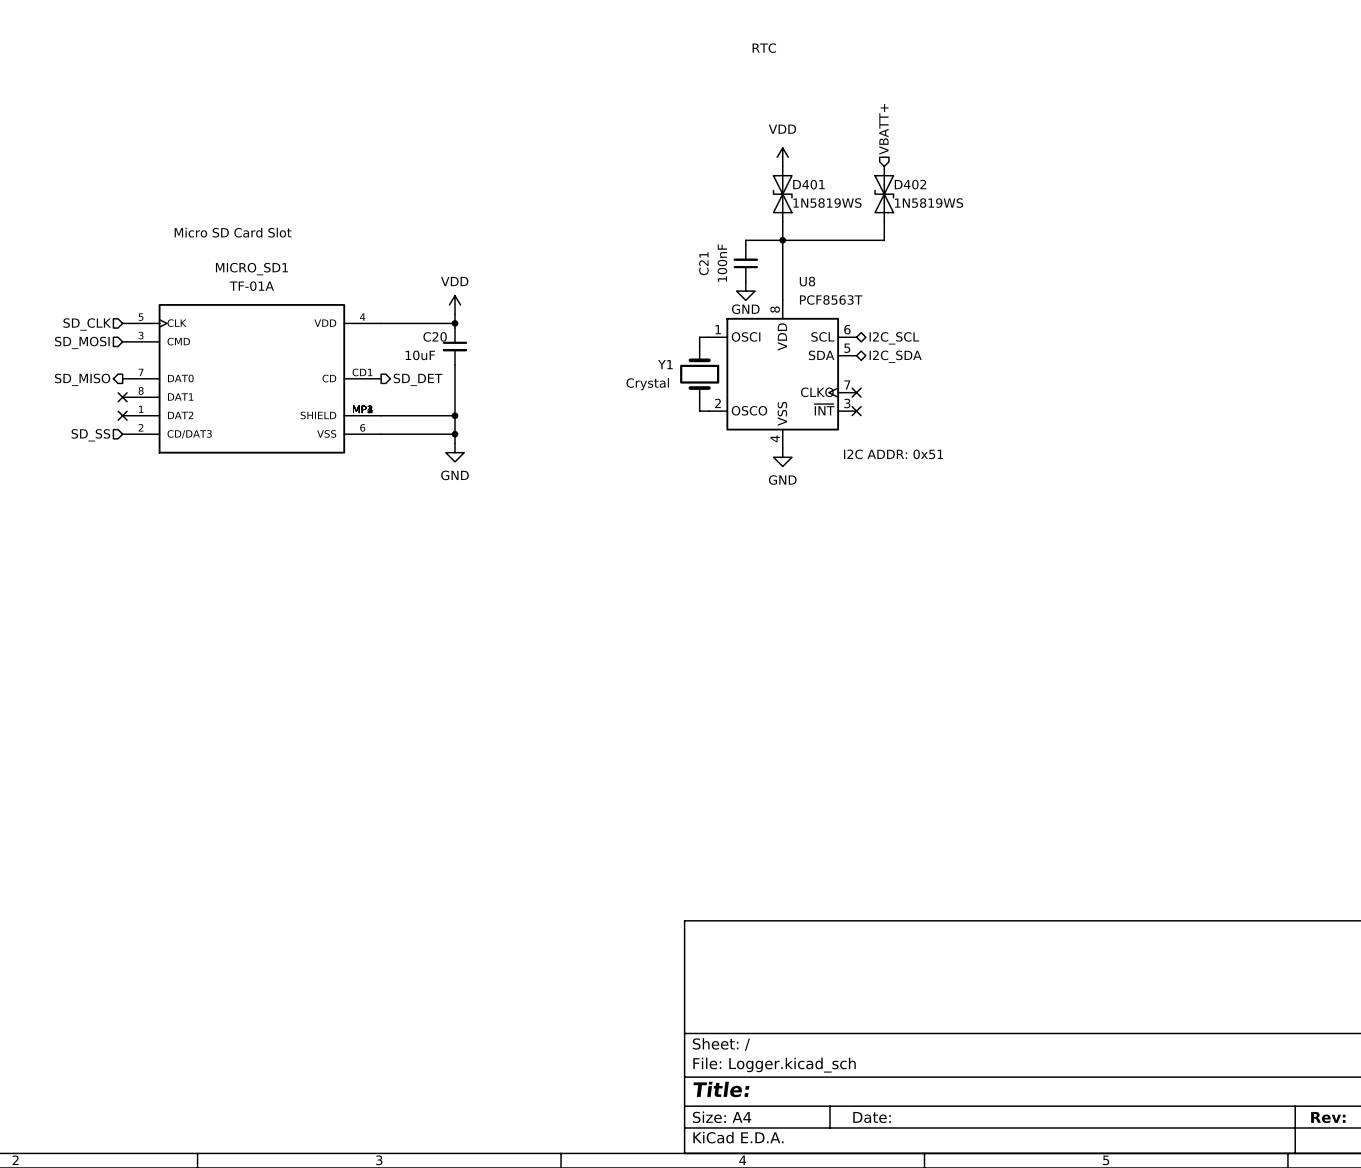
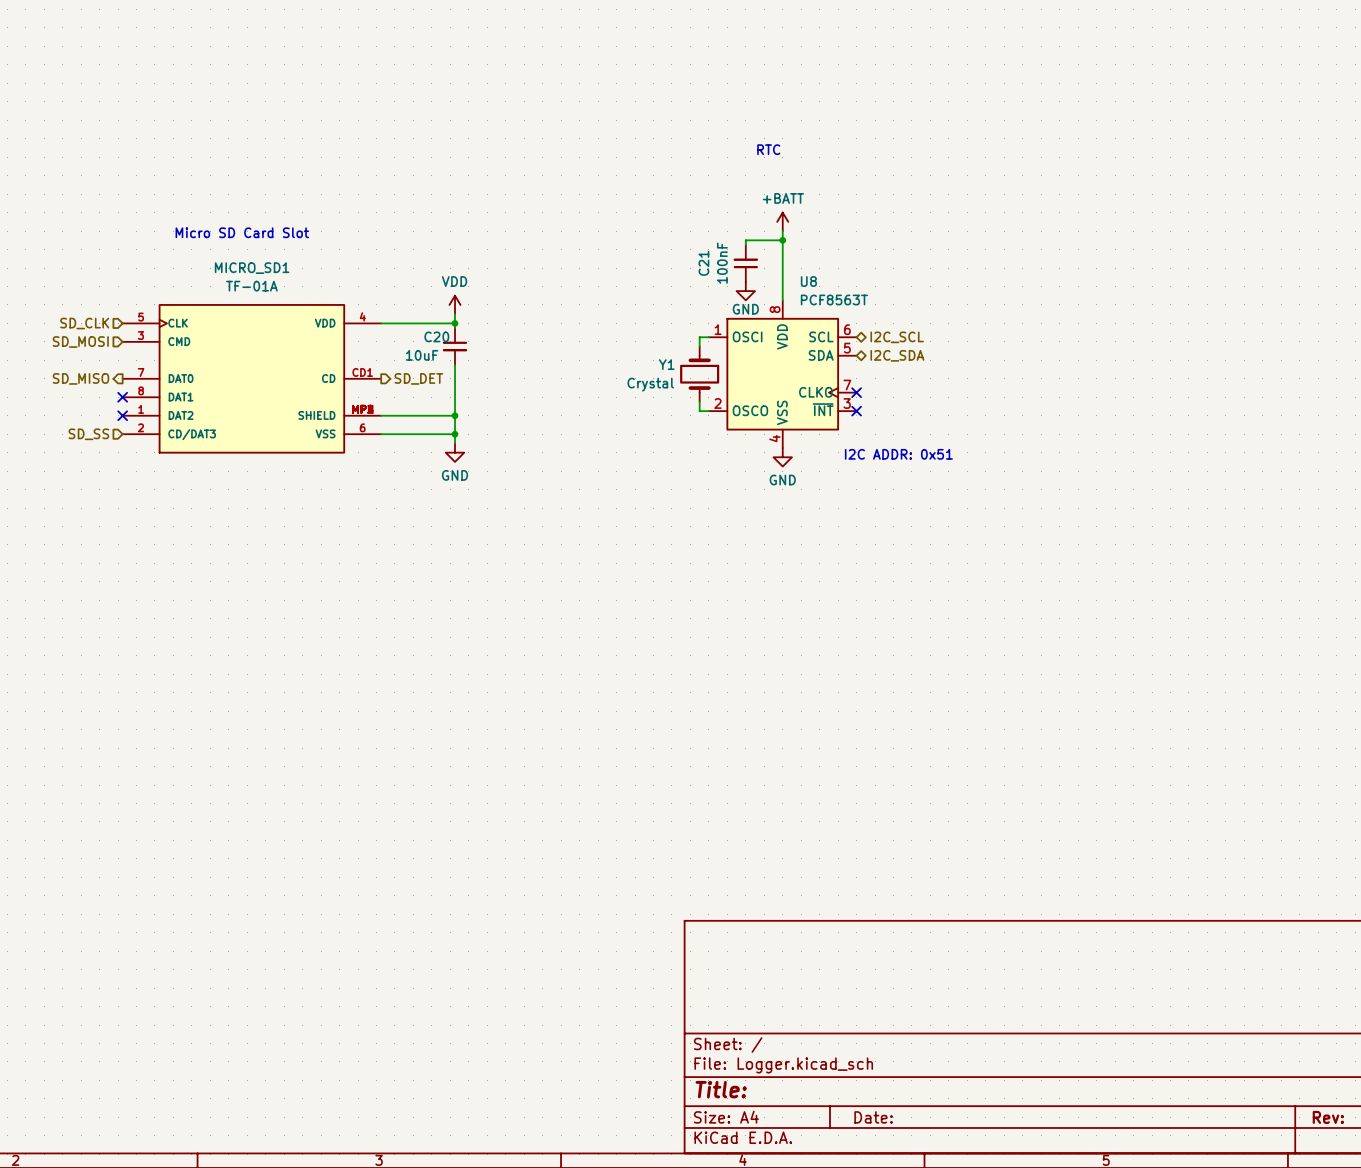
text position: RTC (764, 48) -> RTC (768, 149)
hierarchical label: VBATT+ (883, 129) -> none
power symbol: VDD (782, 157) -> none
D401: 1N5819WS (782, 194) -> none
D402: 1N5819WS (884, 194) -> none
power symbol: none -> +BATT (782, 221)
wire: (884, 221) (884, 240) (782, 240) -> none

